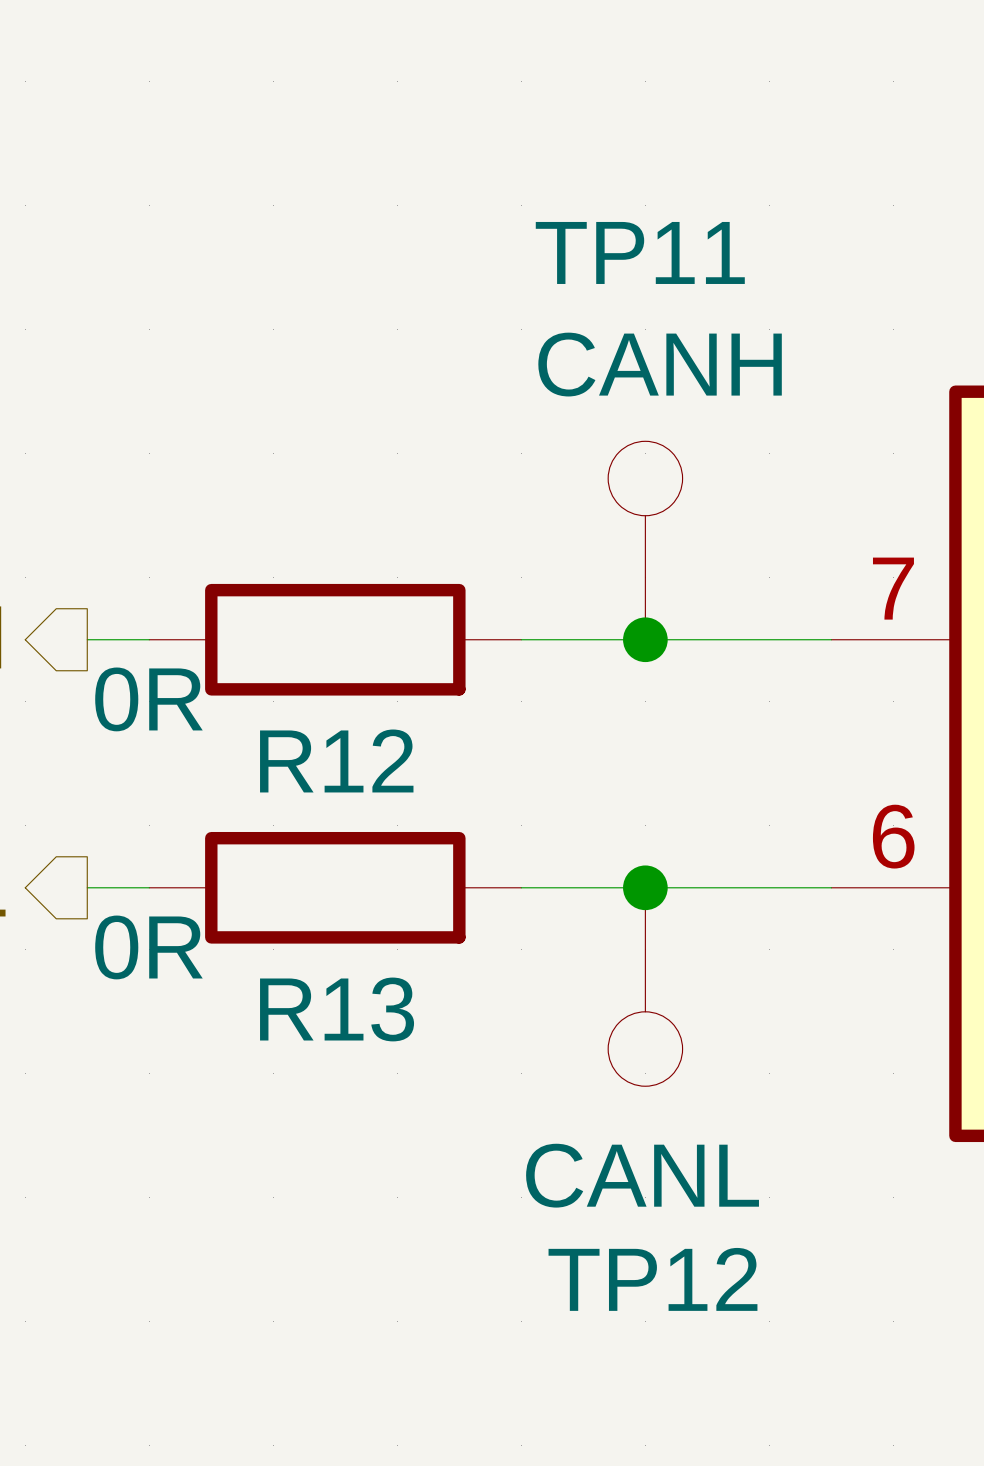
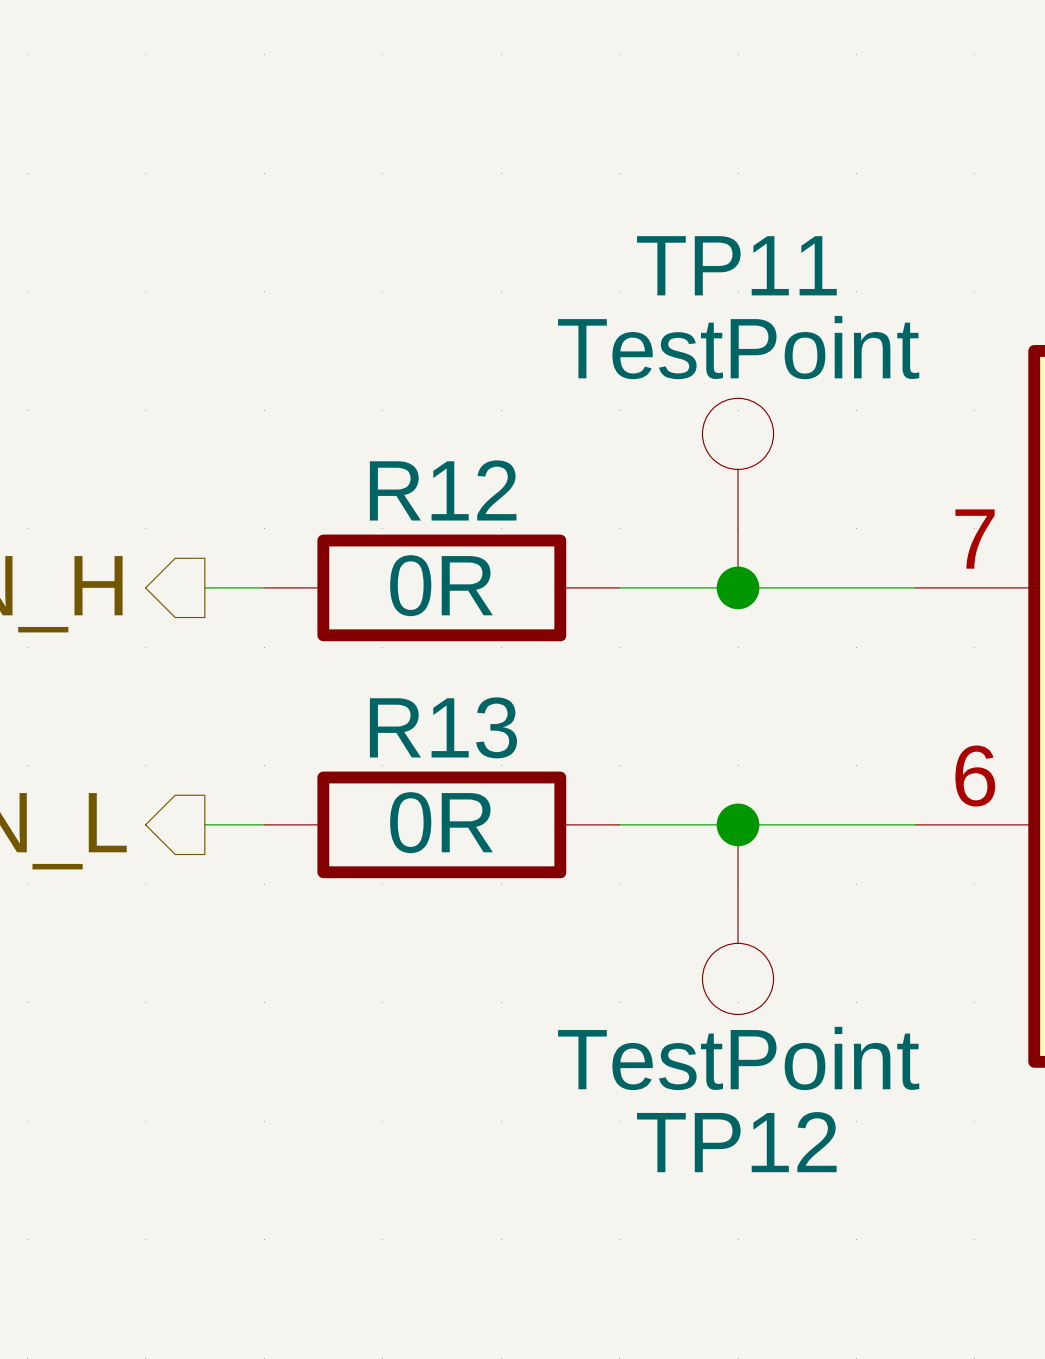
TP11 name position: TP11 (640, 252) -> TP11 (736, 265)
TP11 value: CANH (660, 364) -> TestPoint (738, 347)
R12 value position: 0R (148, 699) -> 0R (441, 585)
R12 name position: R12 (336, 760) -> R12 (443, 490)
R13 value position: 0R (148, 947) -> 0R (441, 822)
R13 name position: R13 (337, 1009) -> R13 (443, 727)
TP12 value: CANL (642, 1175) -> TestPoint (738, 1058)
TP12 name position: TP12 (652, 1279) -> TP12 (736, 1142)

